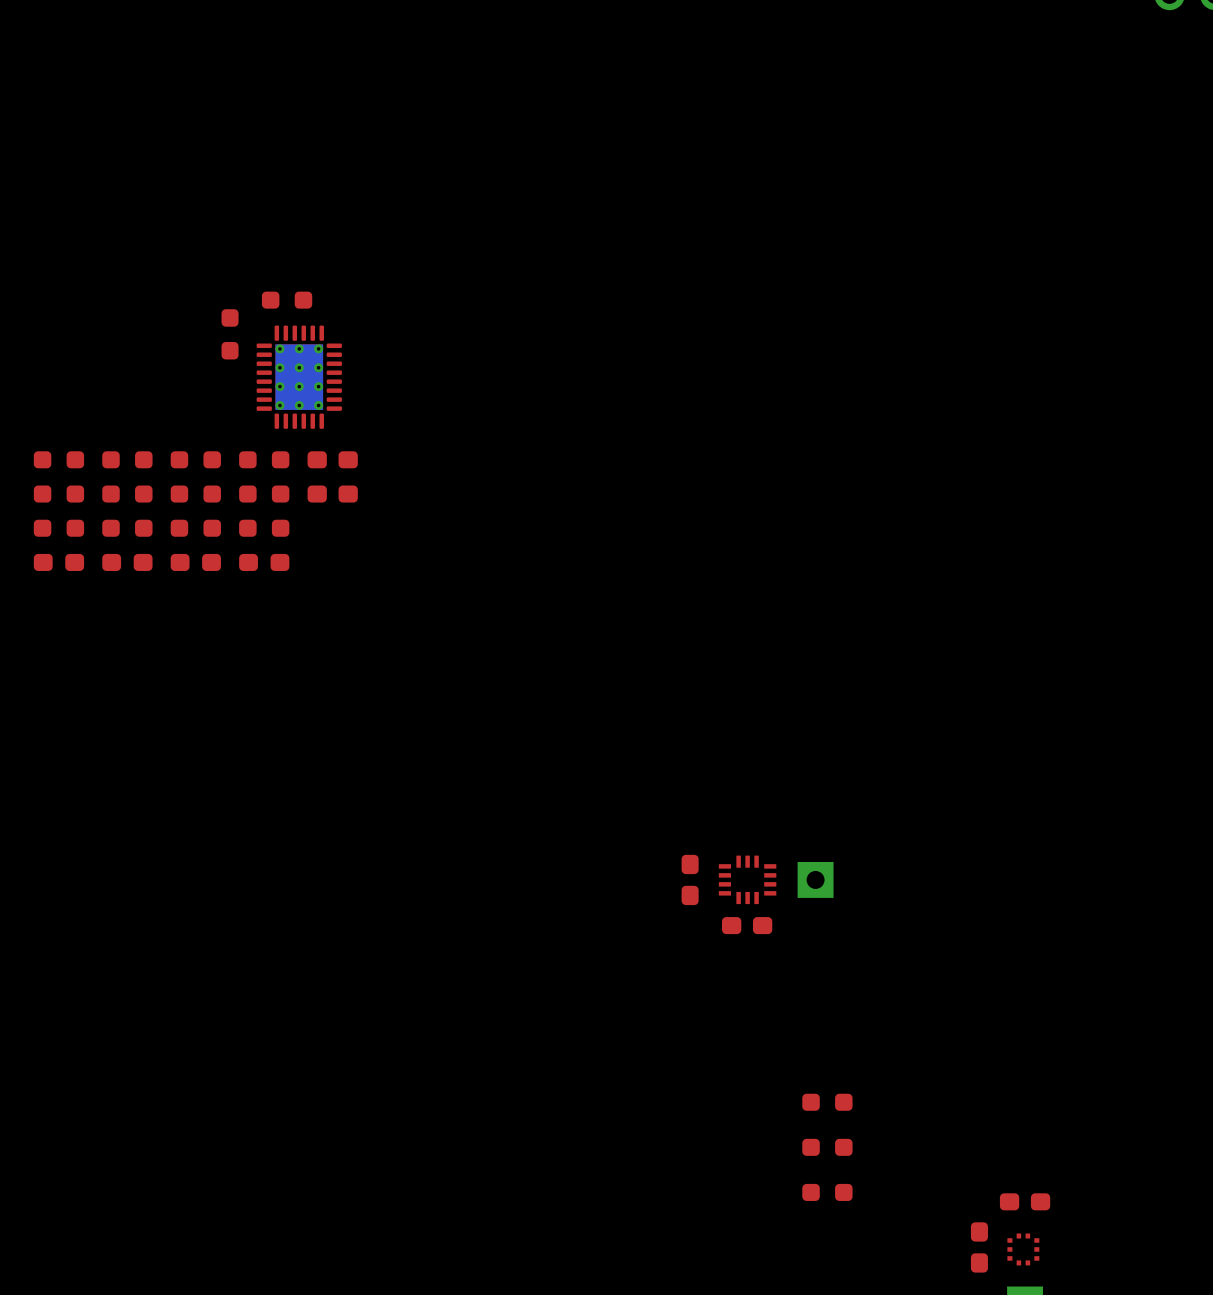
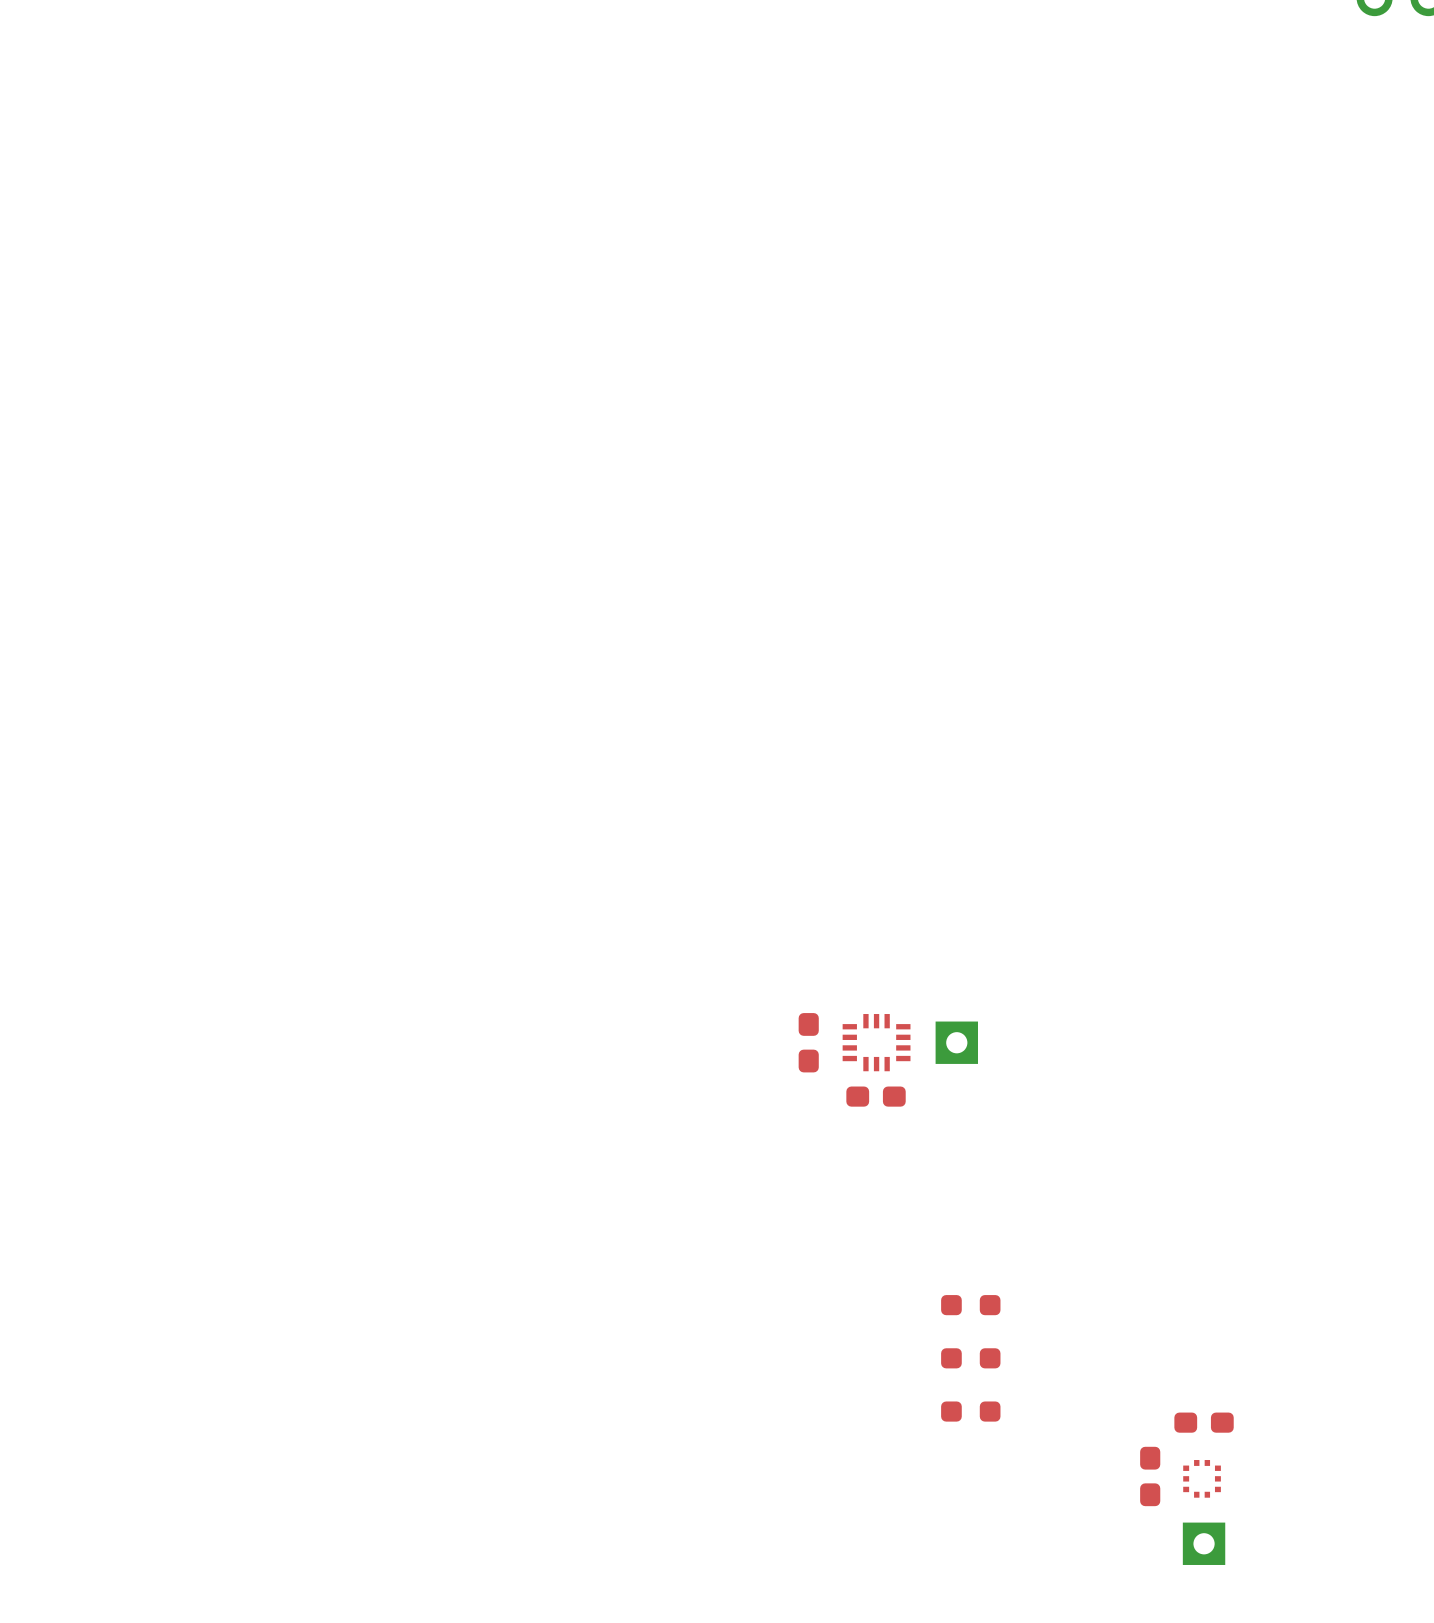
part: (287, 300) -> none
part: (230, 334) -> none
part: (299, 377) -> none
part: (58, 459) -> none
part: (127, 459) -> none
part: (195, 459) -> none
part: (264, 459) -> none
part: (332, 459) -> none
part: (58, 494) -> none
part: (127, 494) -> none
part: (195, 494) -> none
part: (264, 494) -> none
part: (332, 494) -> none
part: (58, 528) -> none
part: (127, 528) -> none
part: (195, 528) -> none
part: (264, 528) -> none
part: (58, 562) -> none
part: (127, 562) -> none
part: (195, 562) -> none
part: (264, 562) -> none

